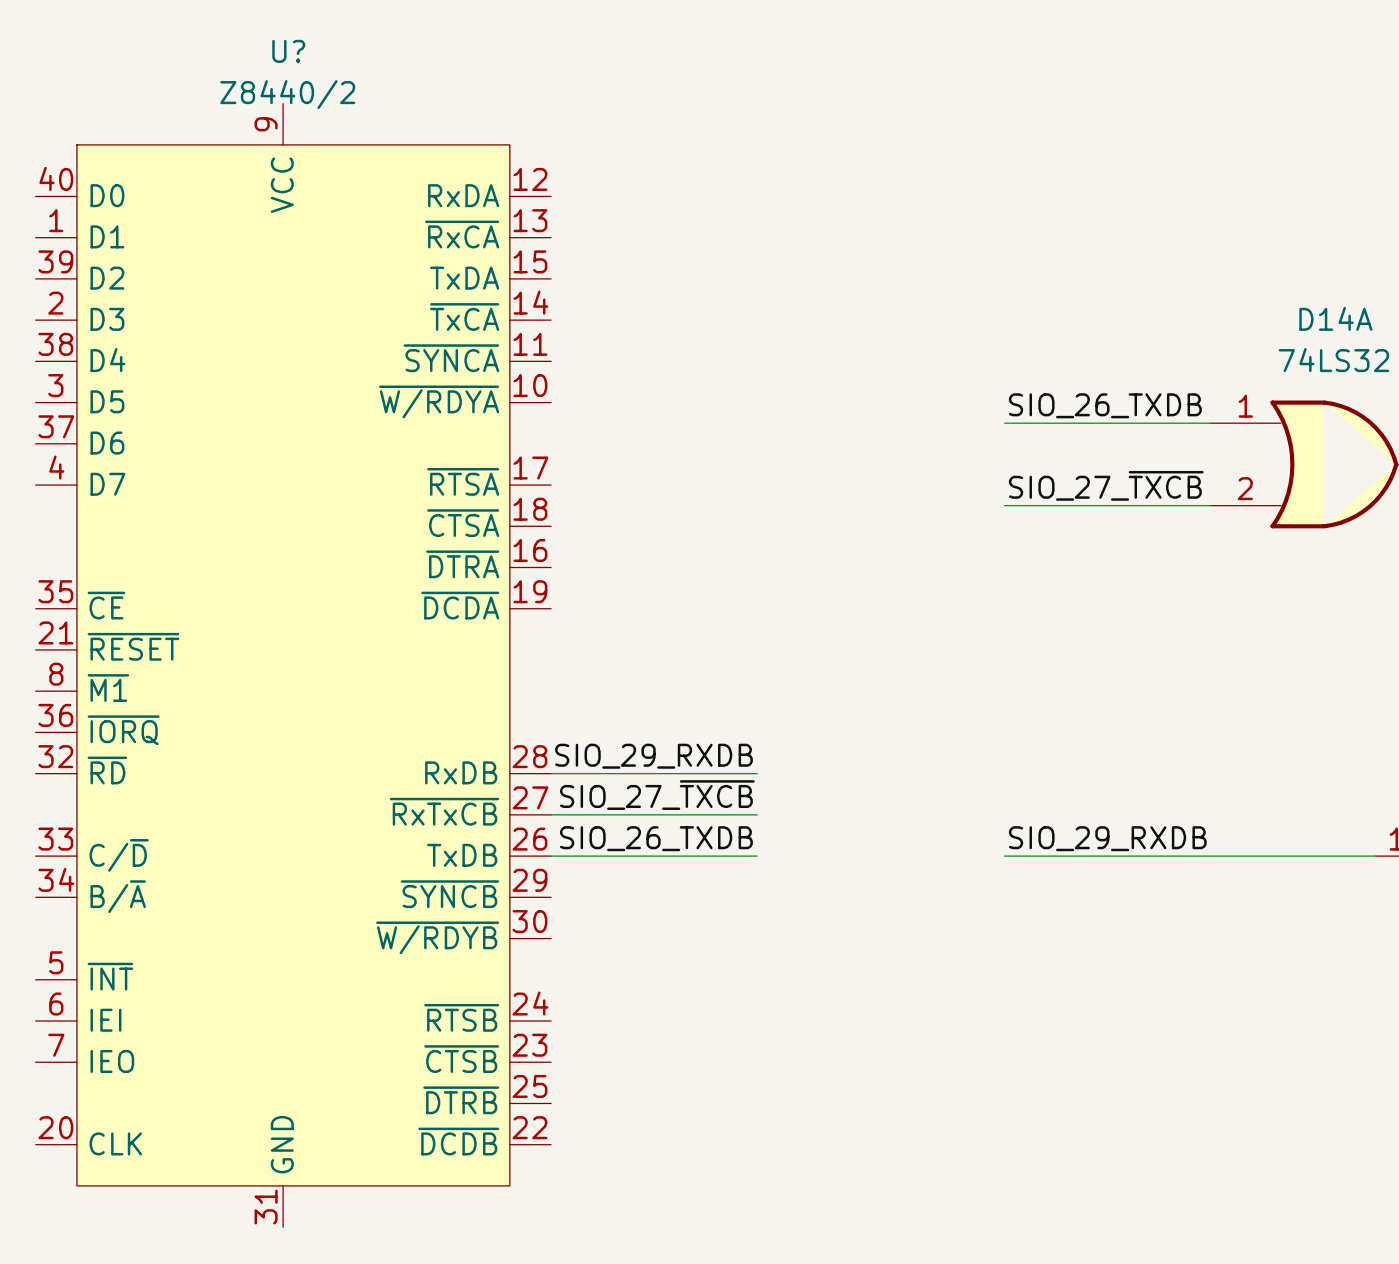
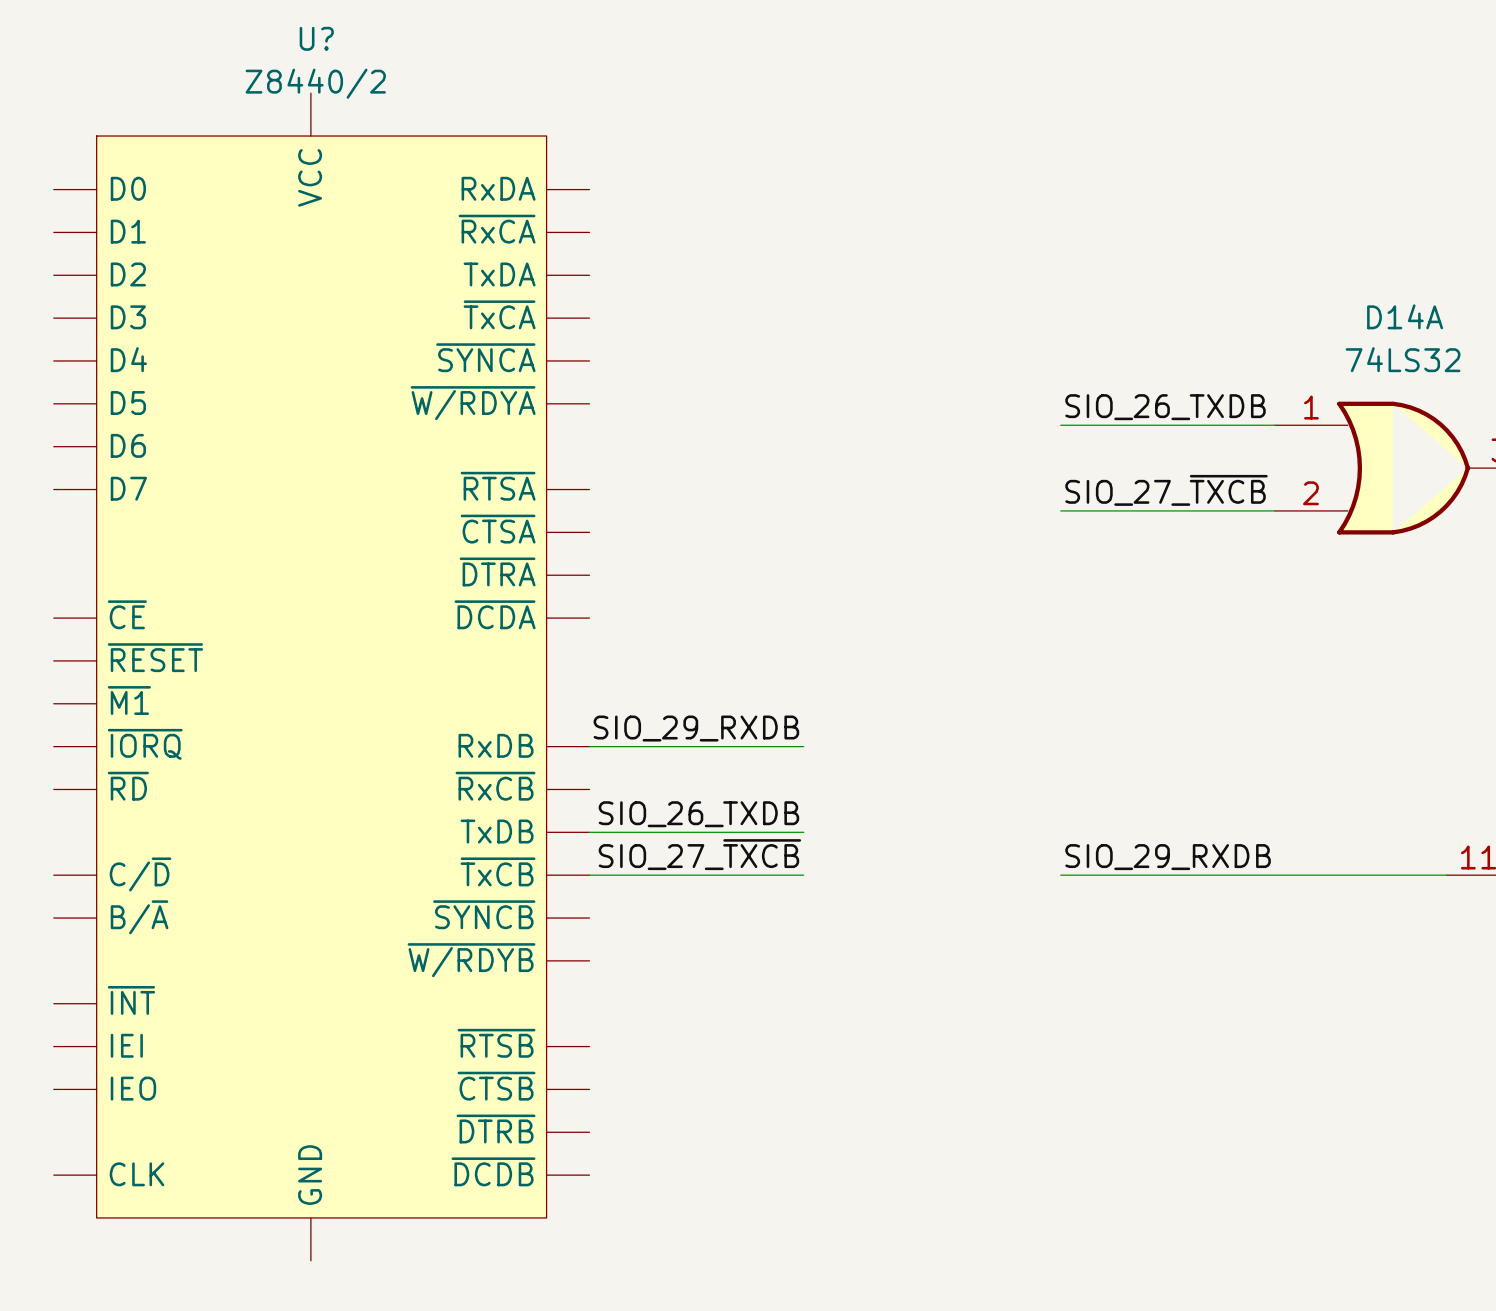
U? symbol: [35, 103, 552, 1228] -> [53, 93, 590, 1261]
label position: SIO_29_RXDB (653, 756) -> SIO_29_RXDB (696, 728)
wire: (551, 773) (757, 773) -> (589, 746) (803, 746)
label: SIO_27_~{TXCB} (657, 795) -> SIO_26_TXDB (698, 814)
label: SIO_26_TXDB (656, 838) -> SIO_27_~{TXCB} (699, 854)

